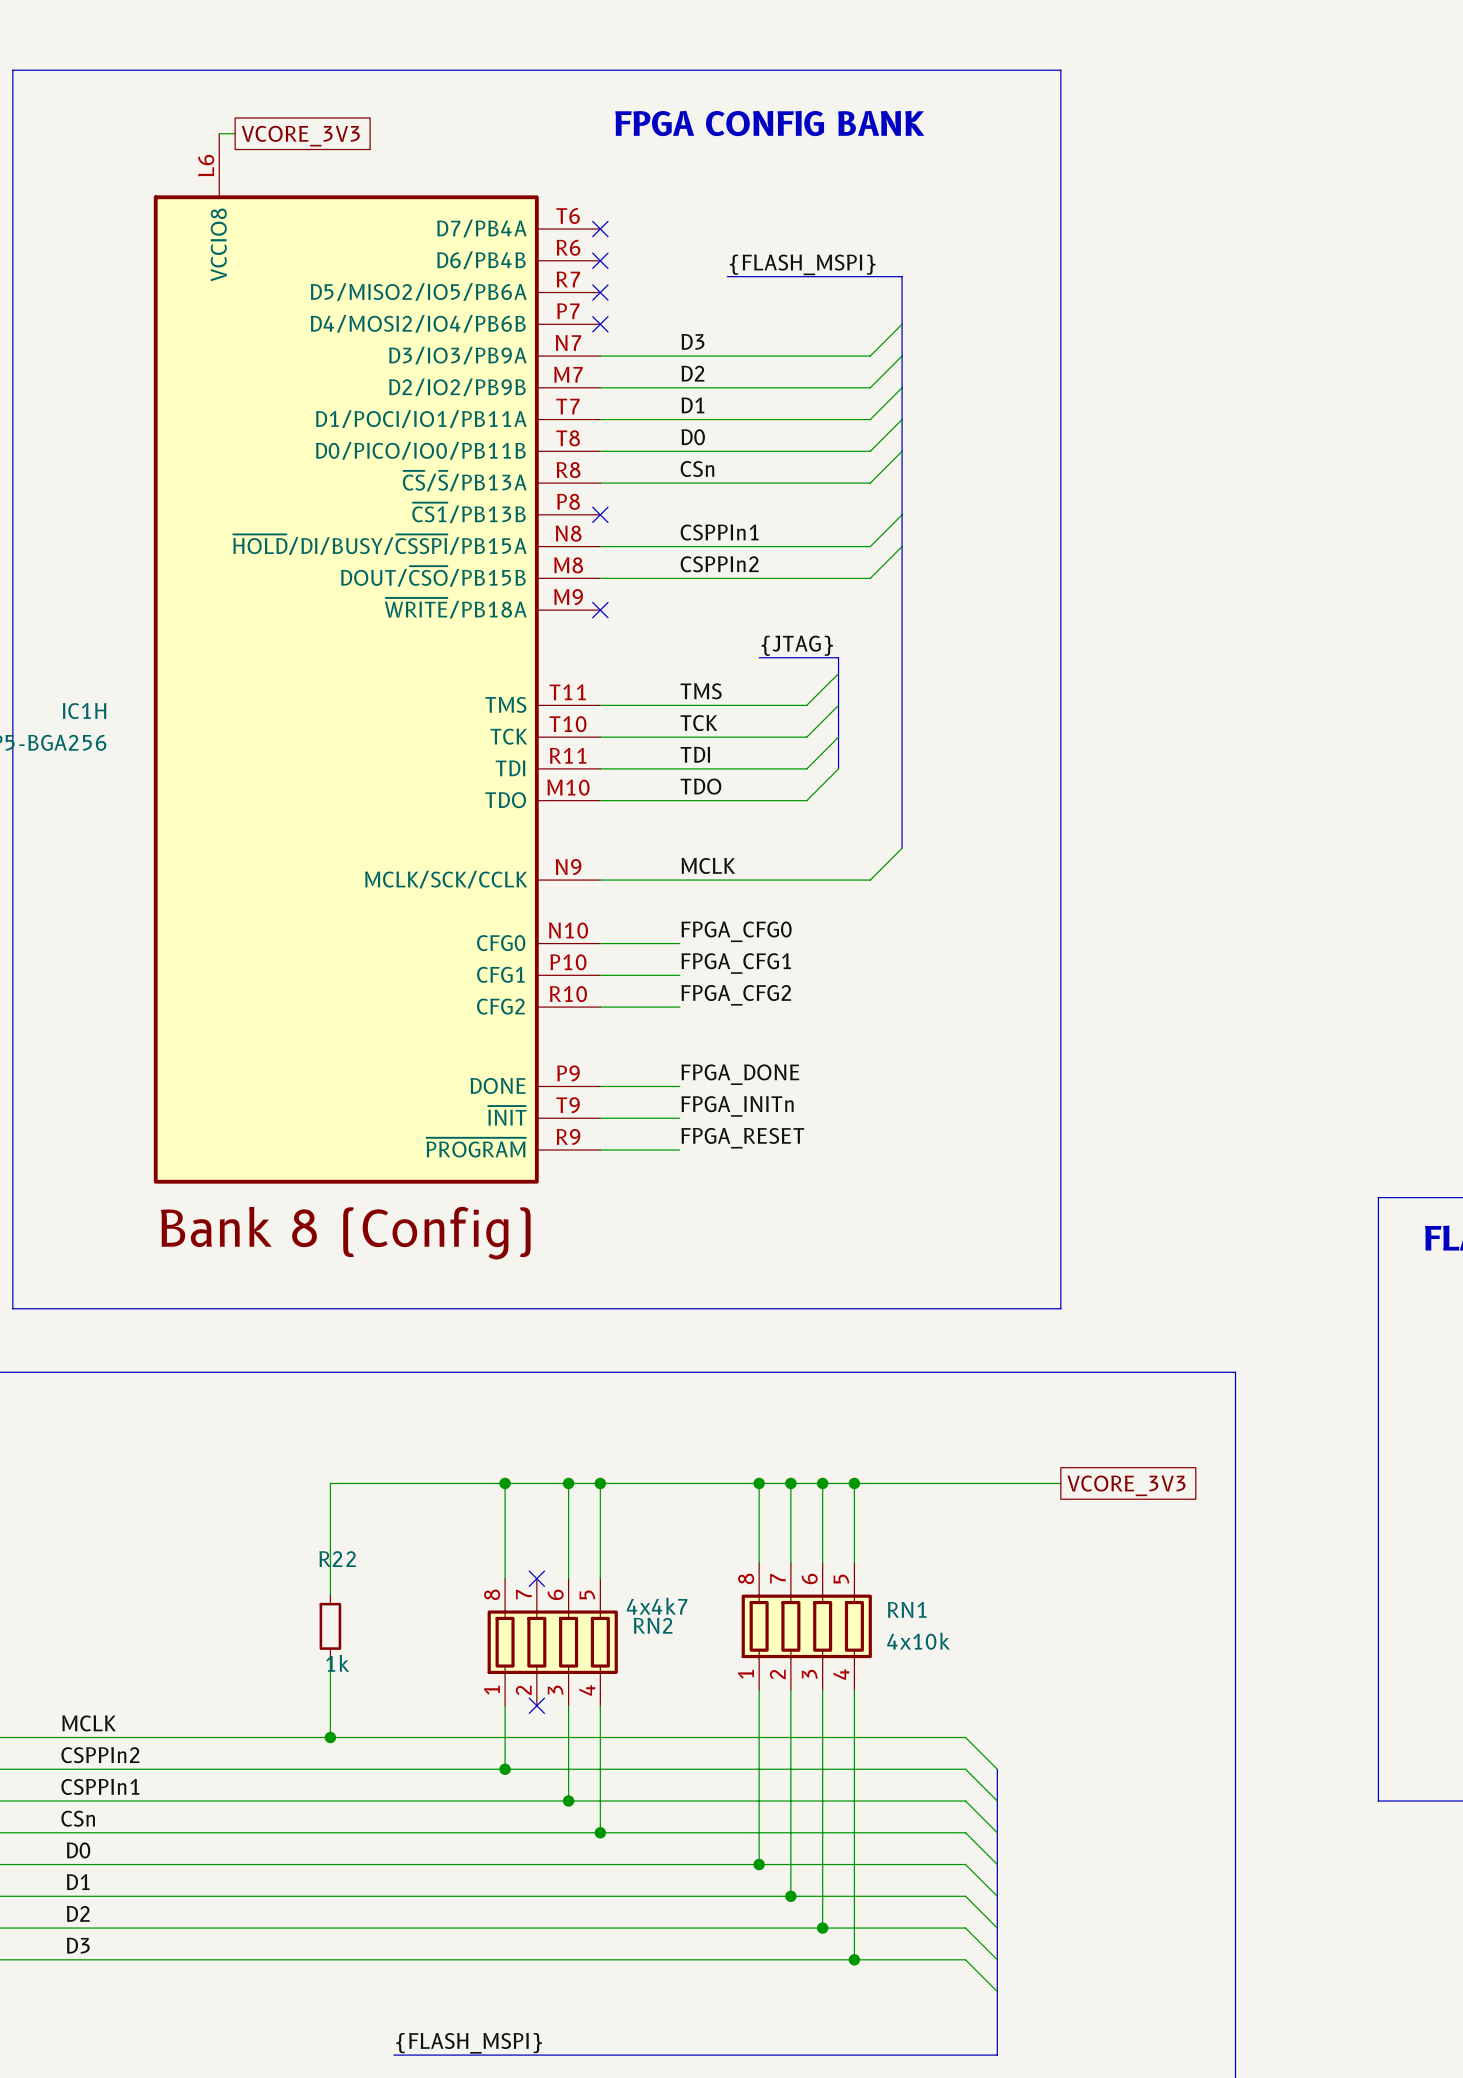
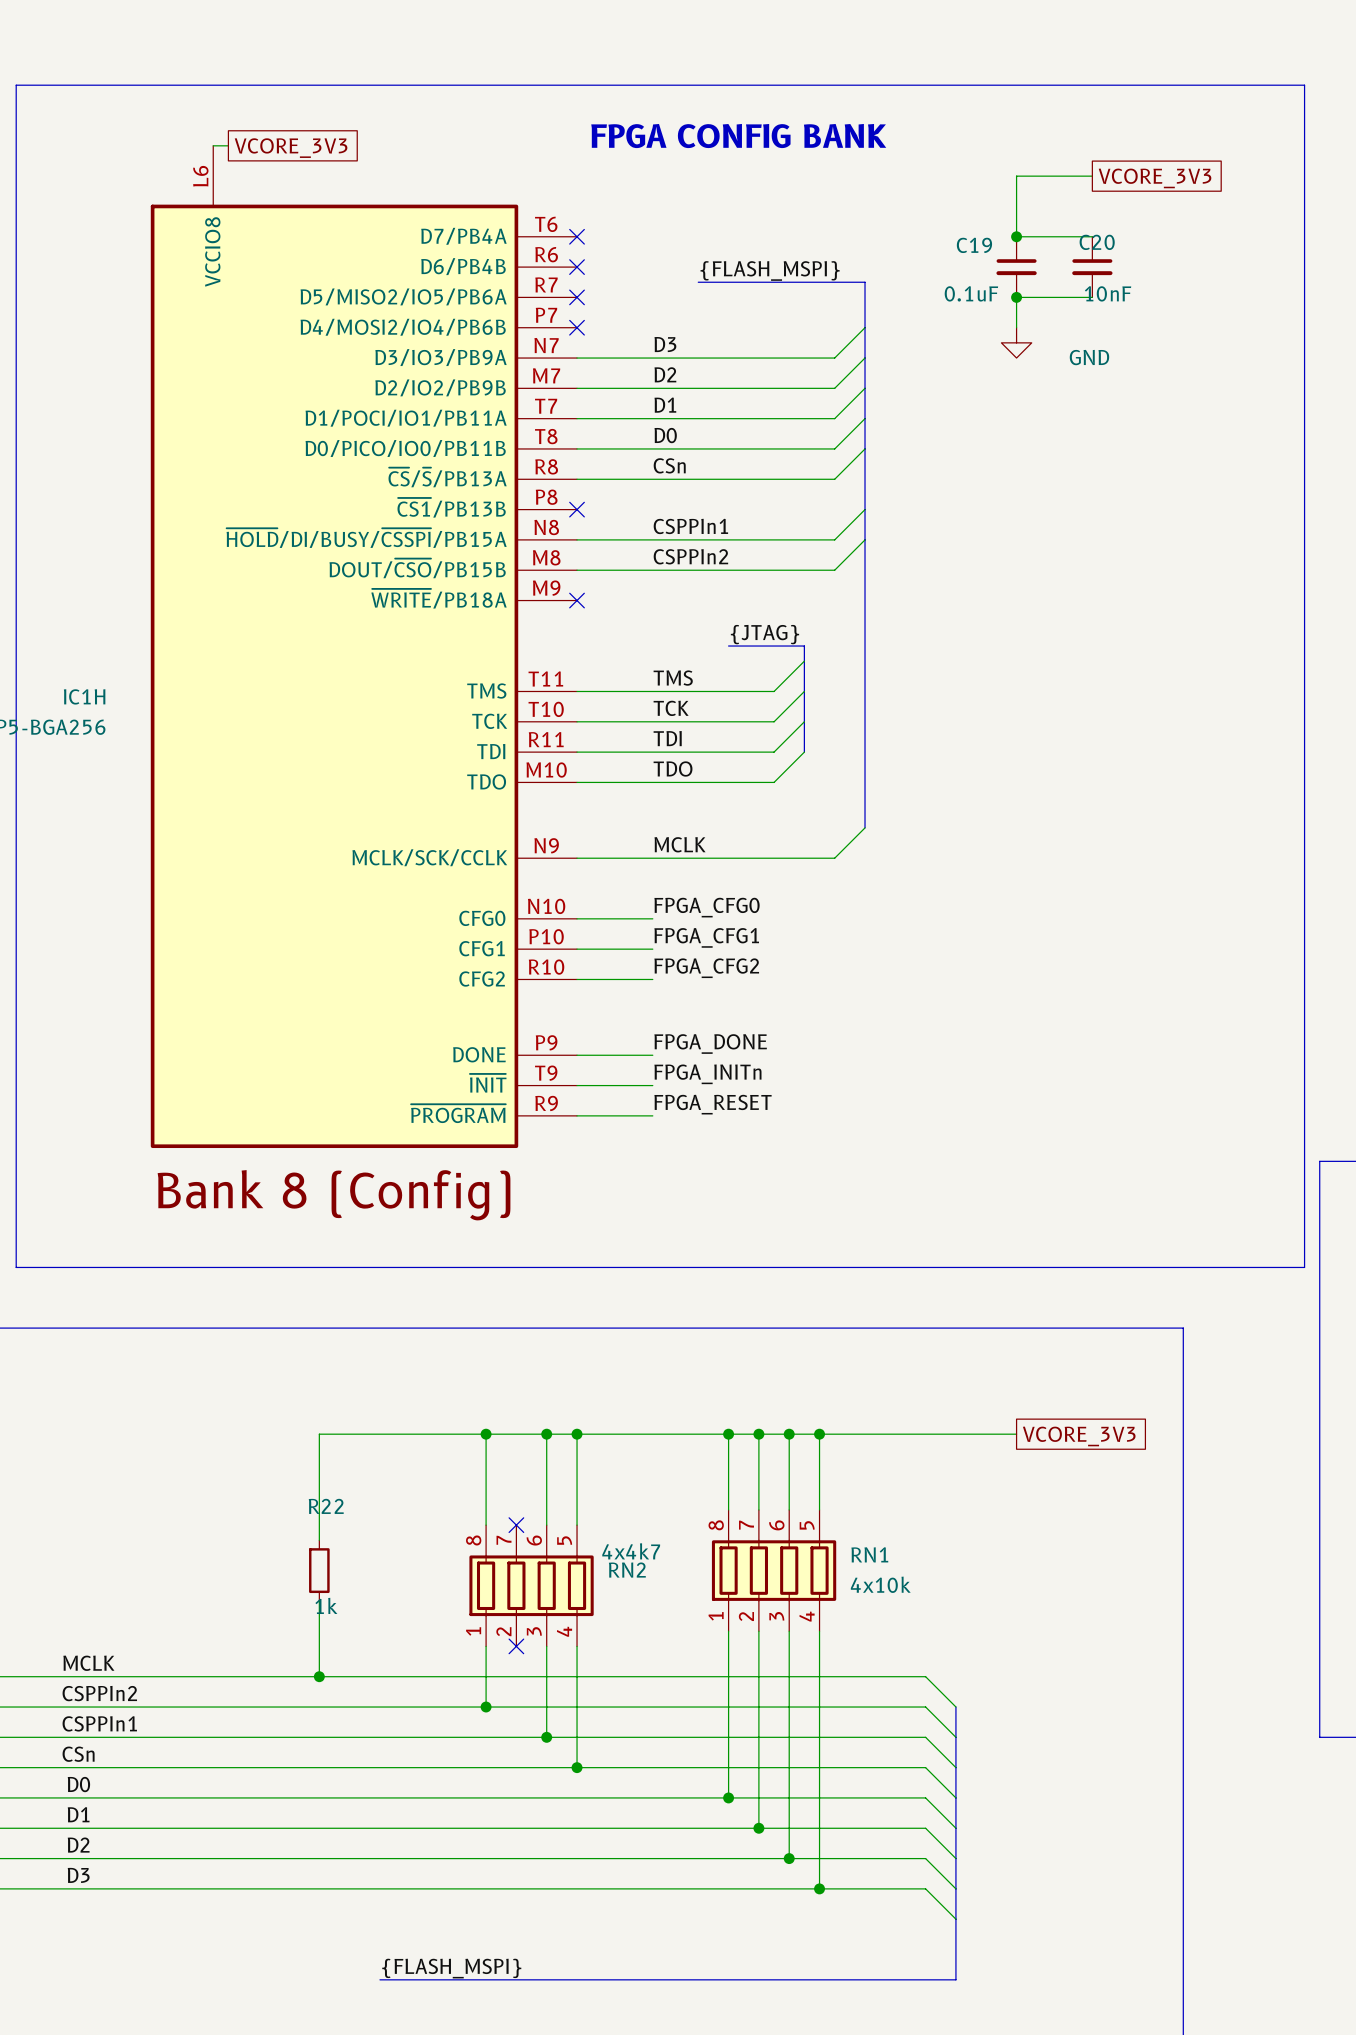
line: (1060, 70) (1060, 1308) -> (1016, 85) (1304, 85) (1304, 1267) (1016, 1267)
wire: none -> (1092, 176) (1016, 176) (1016, 236) (1092, 236)
global label: none -> VCORE_3V3 (1155, 178)
junction: none -> (1016, 236)
C19: none -> 0.1uF (1016, 267)
C20: none -> 10nF (1092, 267)
junction: none -> (1016, 297)
wire: none -> (1092, 297) (1016, 297) (1016, 327)
power symbol: none -> GND (1016, 342)

